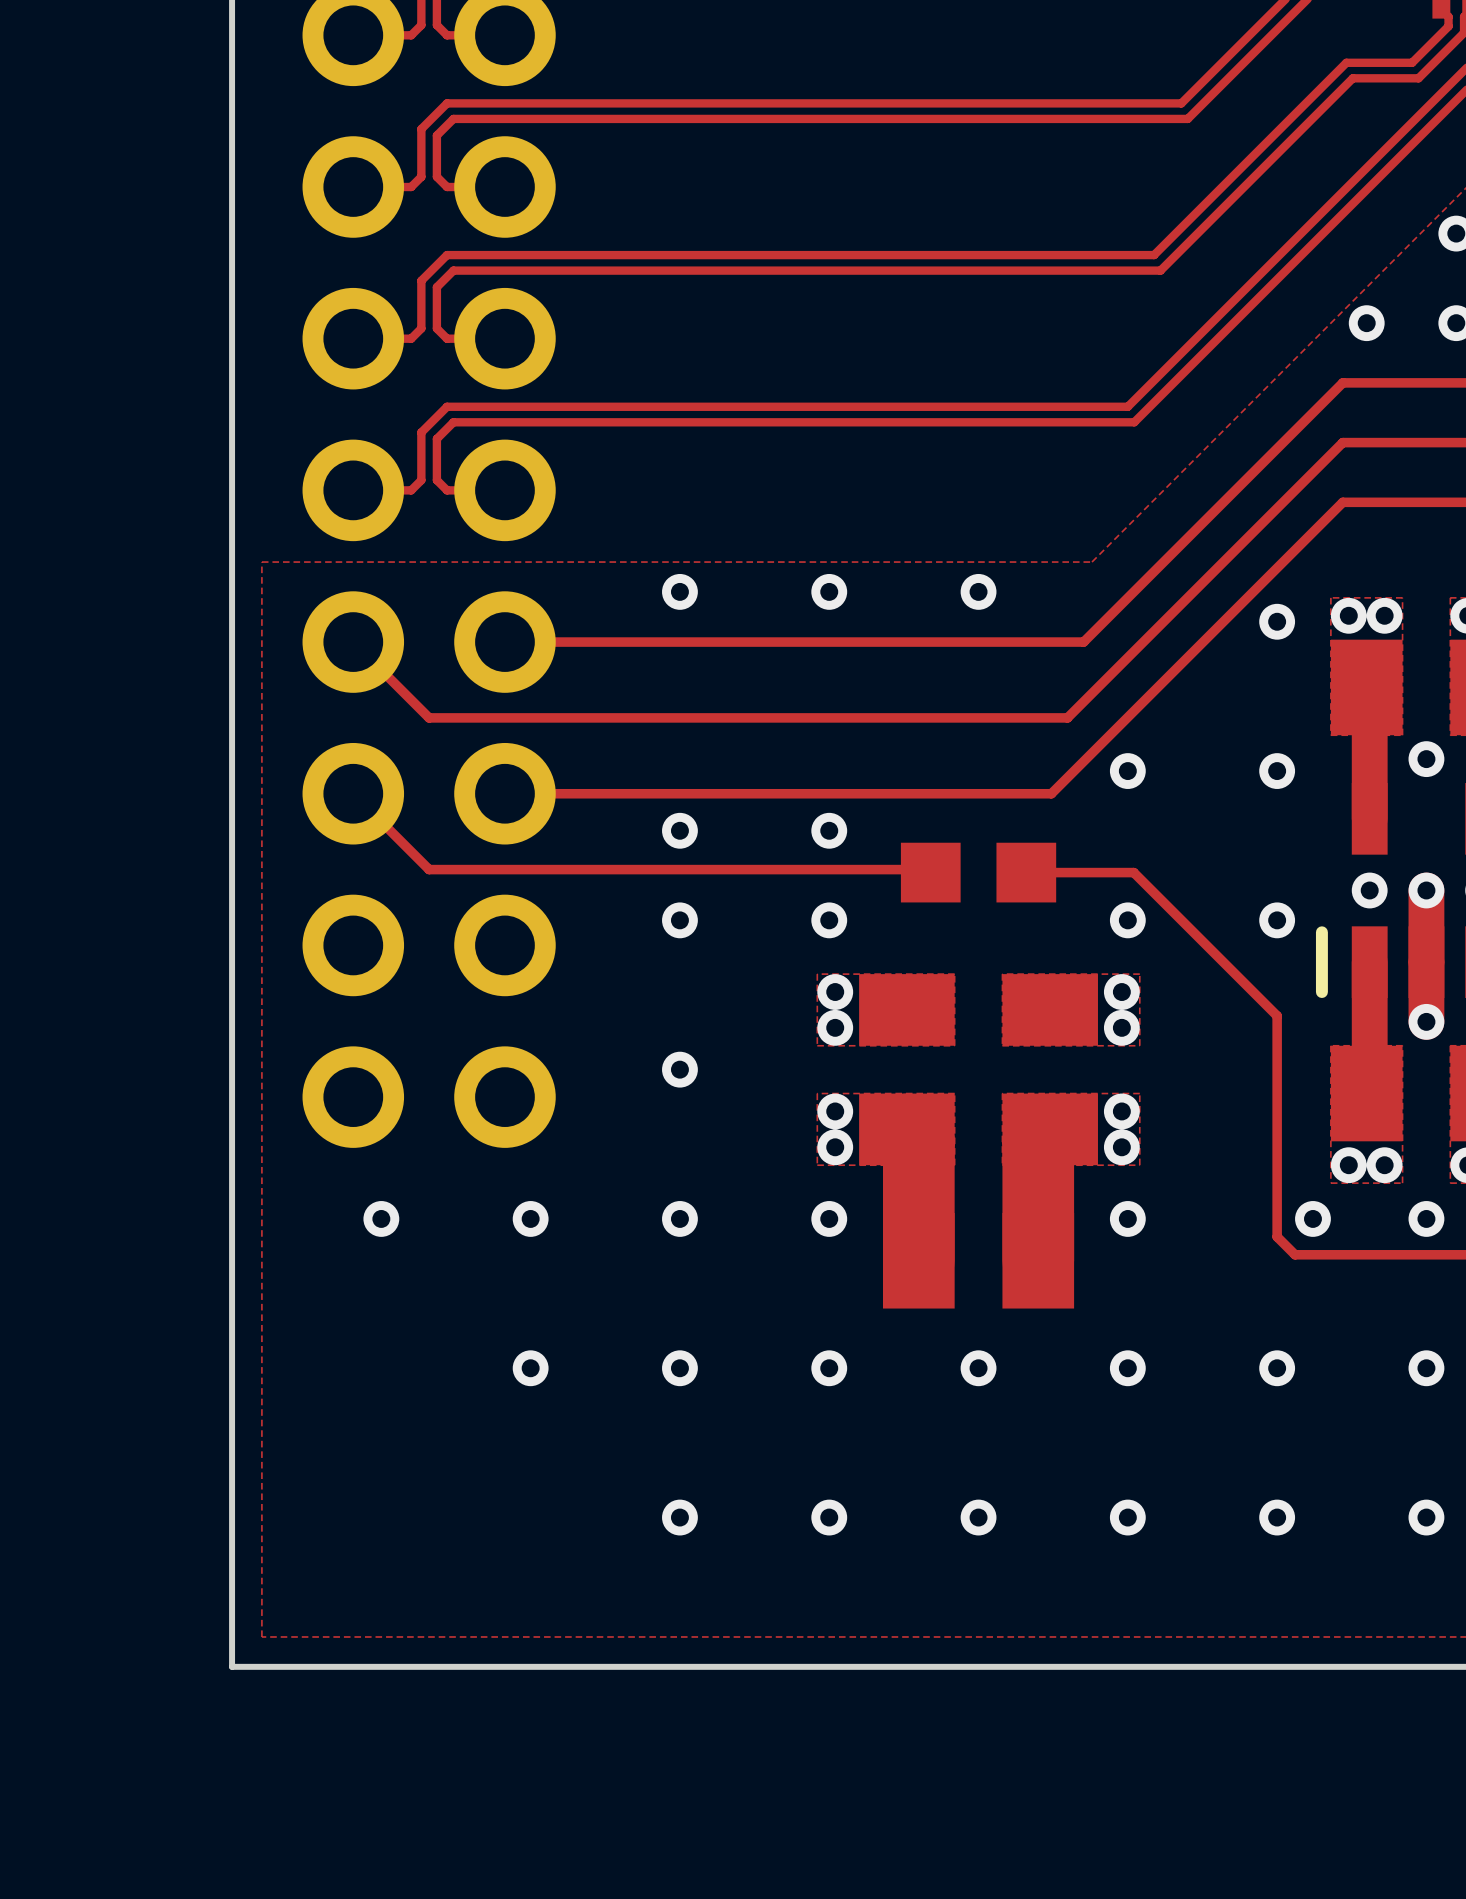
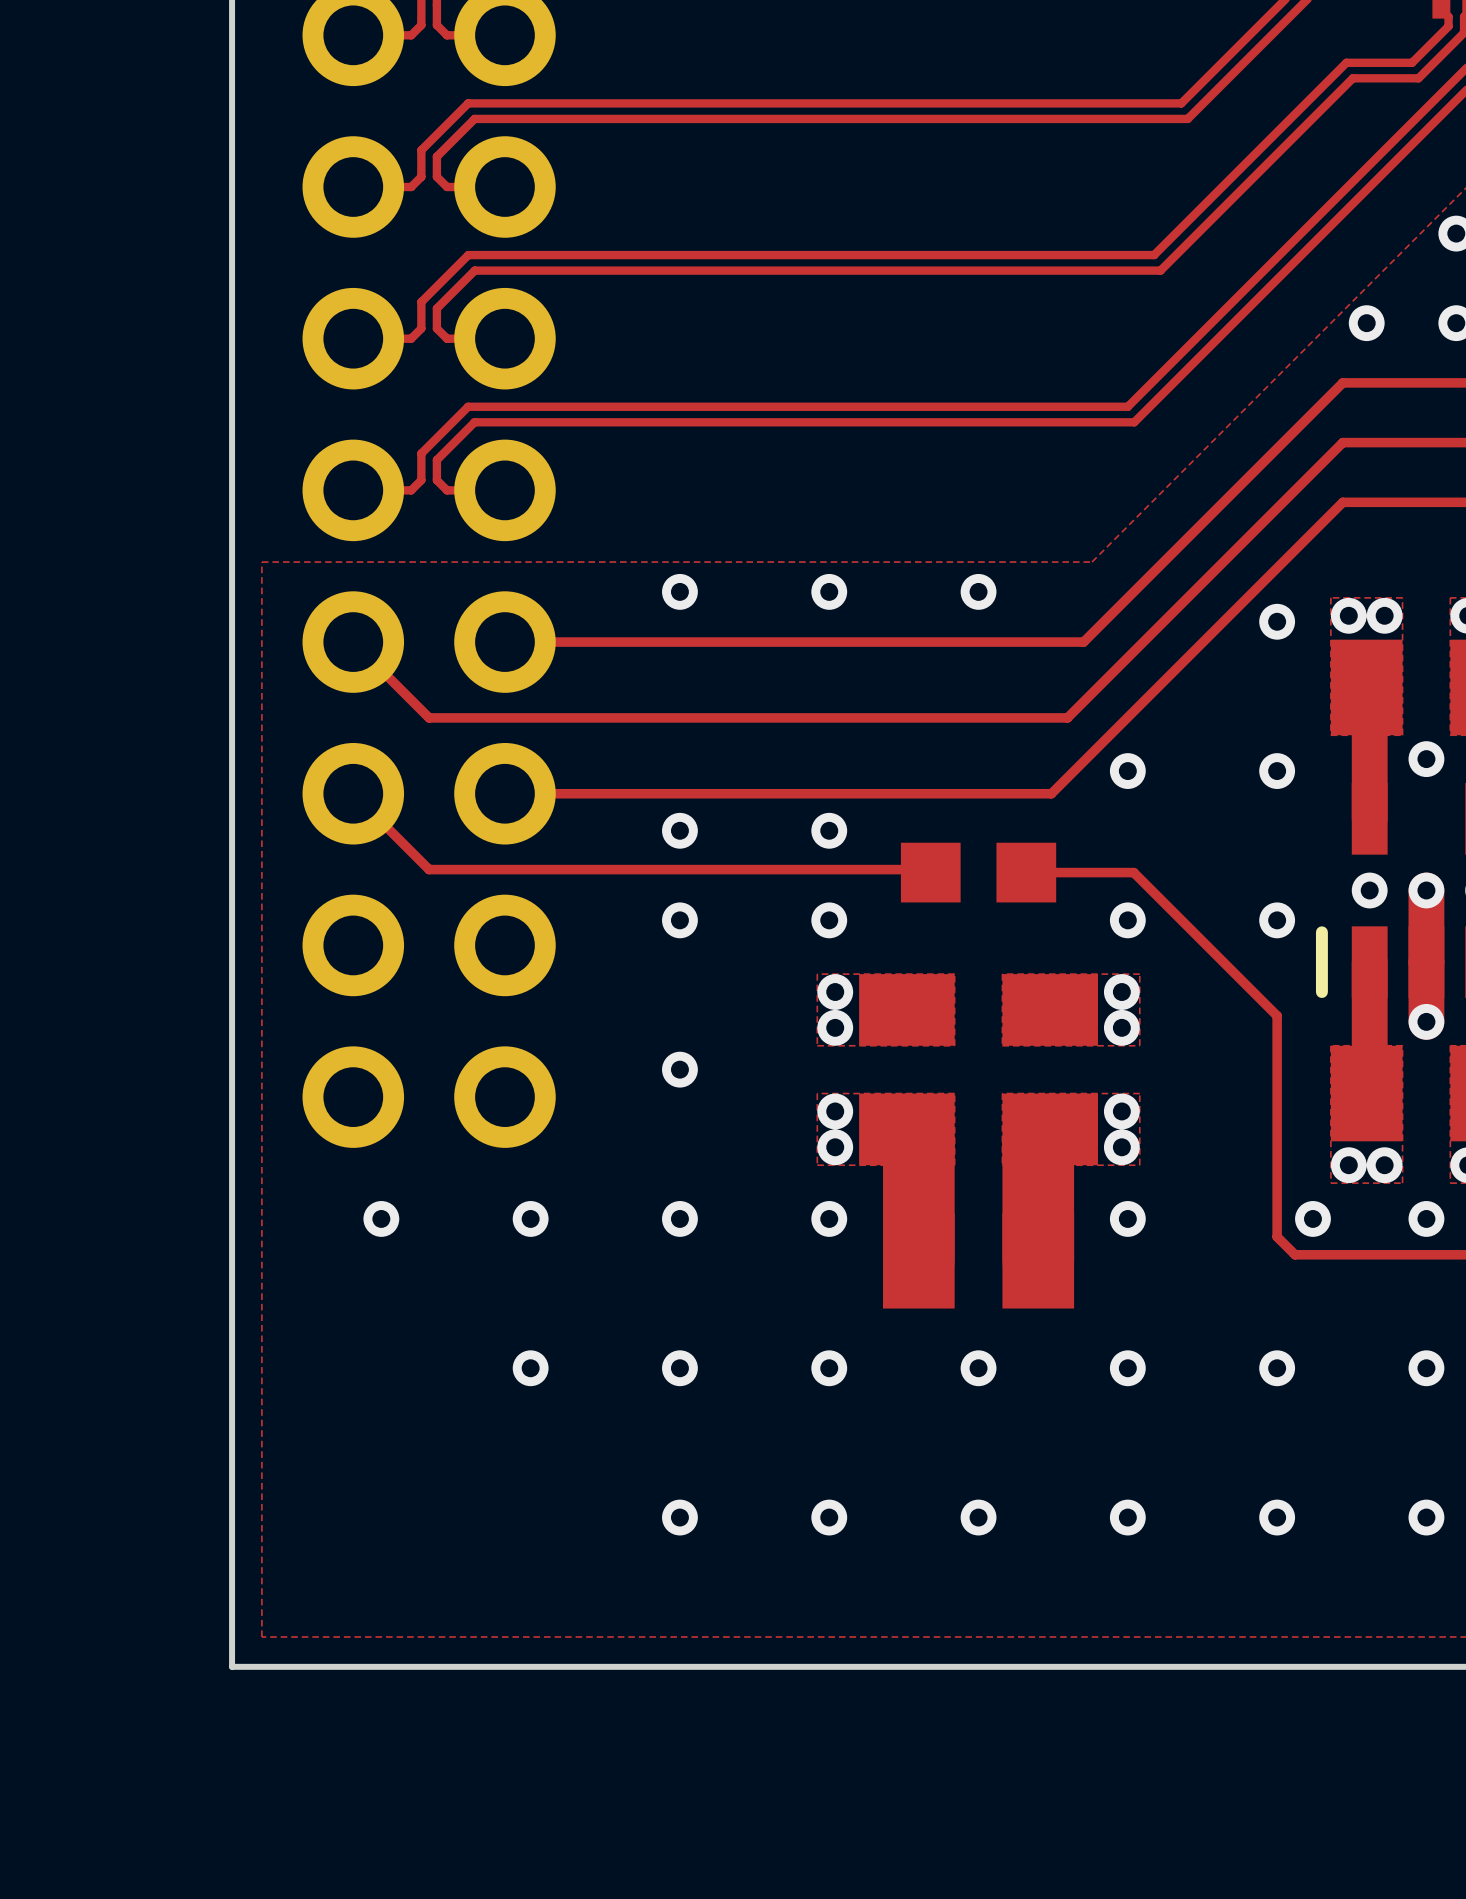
track: (468, 103) (447, 103) (421, 129) (421, 150) -> (468, 103) (421, 150)
track: (474, 118) (453, 118) (436, 135) (436, 156) -> (474, 118) (436, 156)
track: (468, 255) (447, 255) (421, 280) (421, 302) -> (468, 255) (421, 302)
track: (474, 270) (453, 270) (436, 287) (436, 308) -> (474, 270) (436, 308)
track: (468, 406) (447, 406) (421, 432) (421, 453) -> (468, 406) (421, 453)
track: (474, 422) (453, 422) (436, 438) (436, 459) -> (474, 422) (436, 459)

